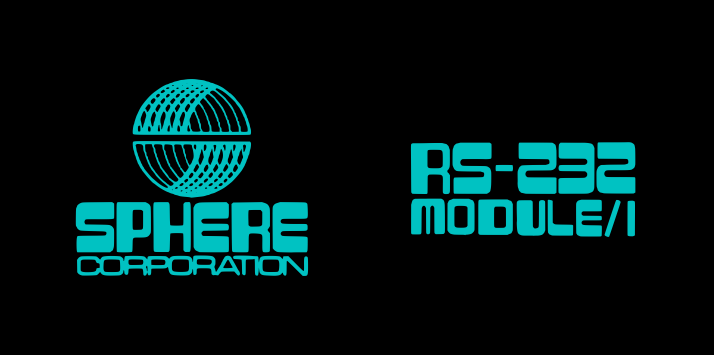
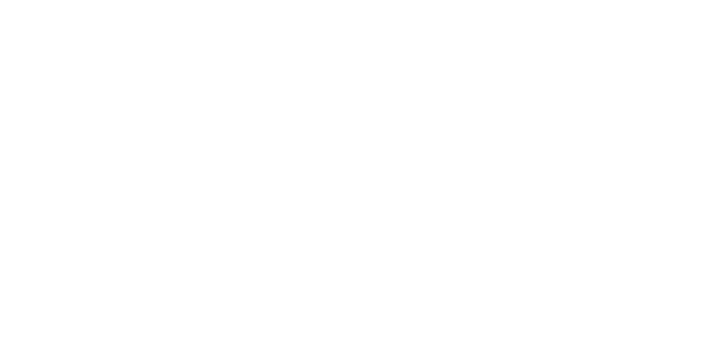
drawing: [75, 79, 309, 276] -> none
drawing: [410, 142, 636, 237] -> none

